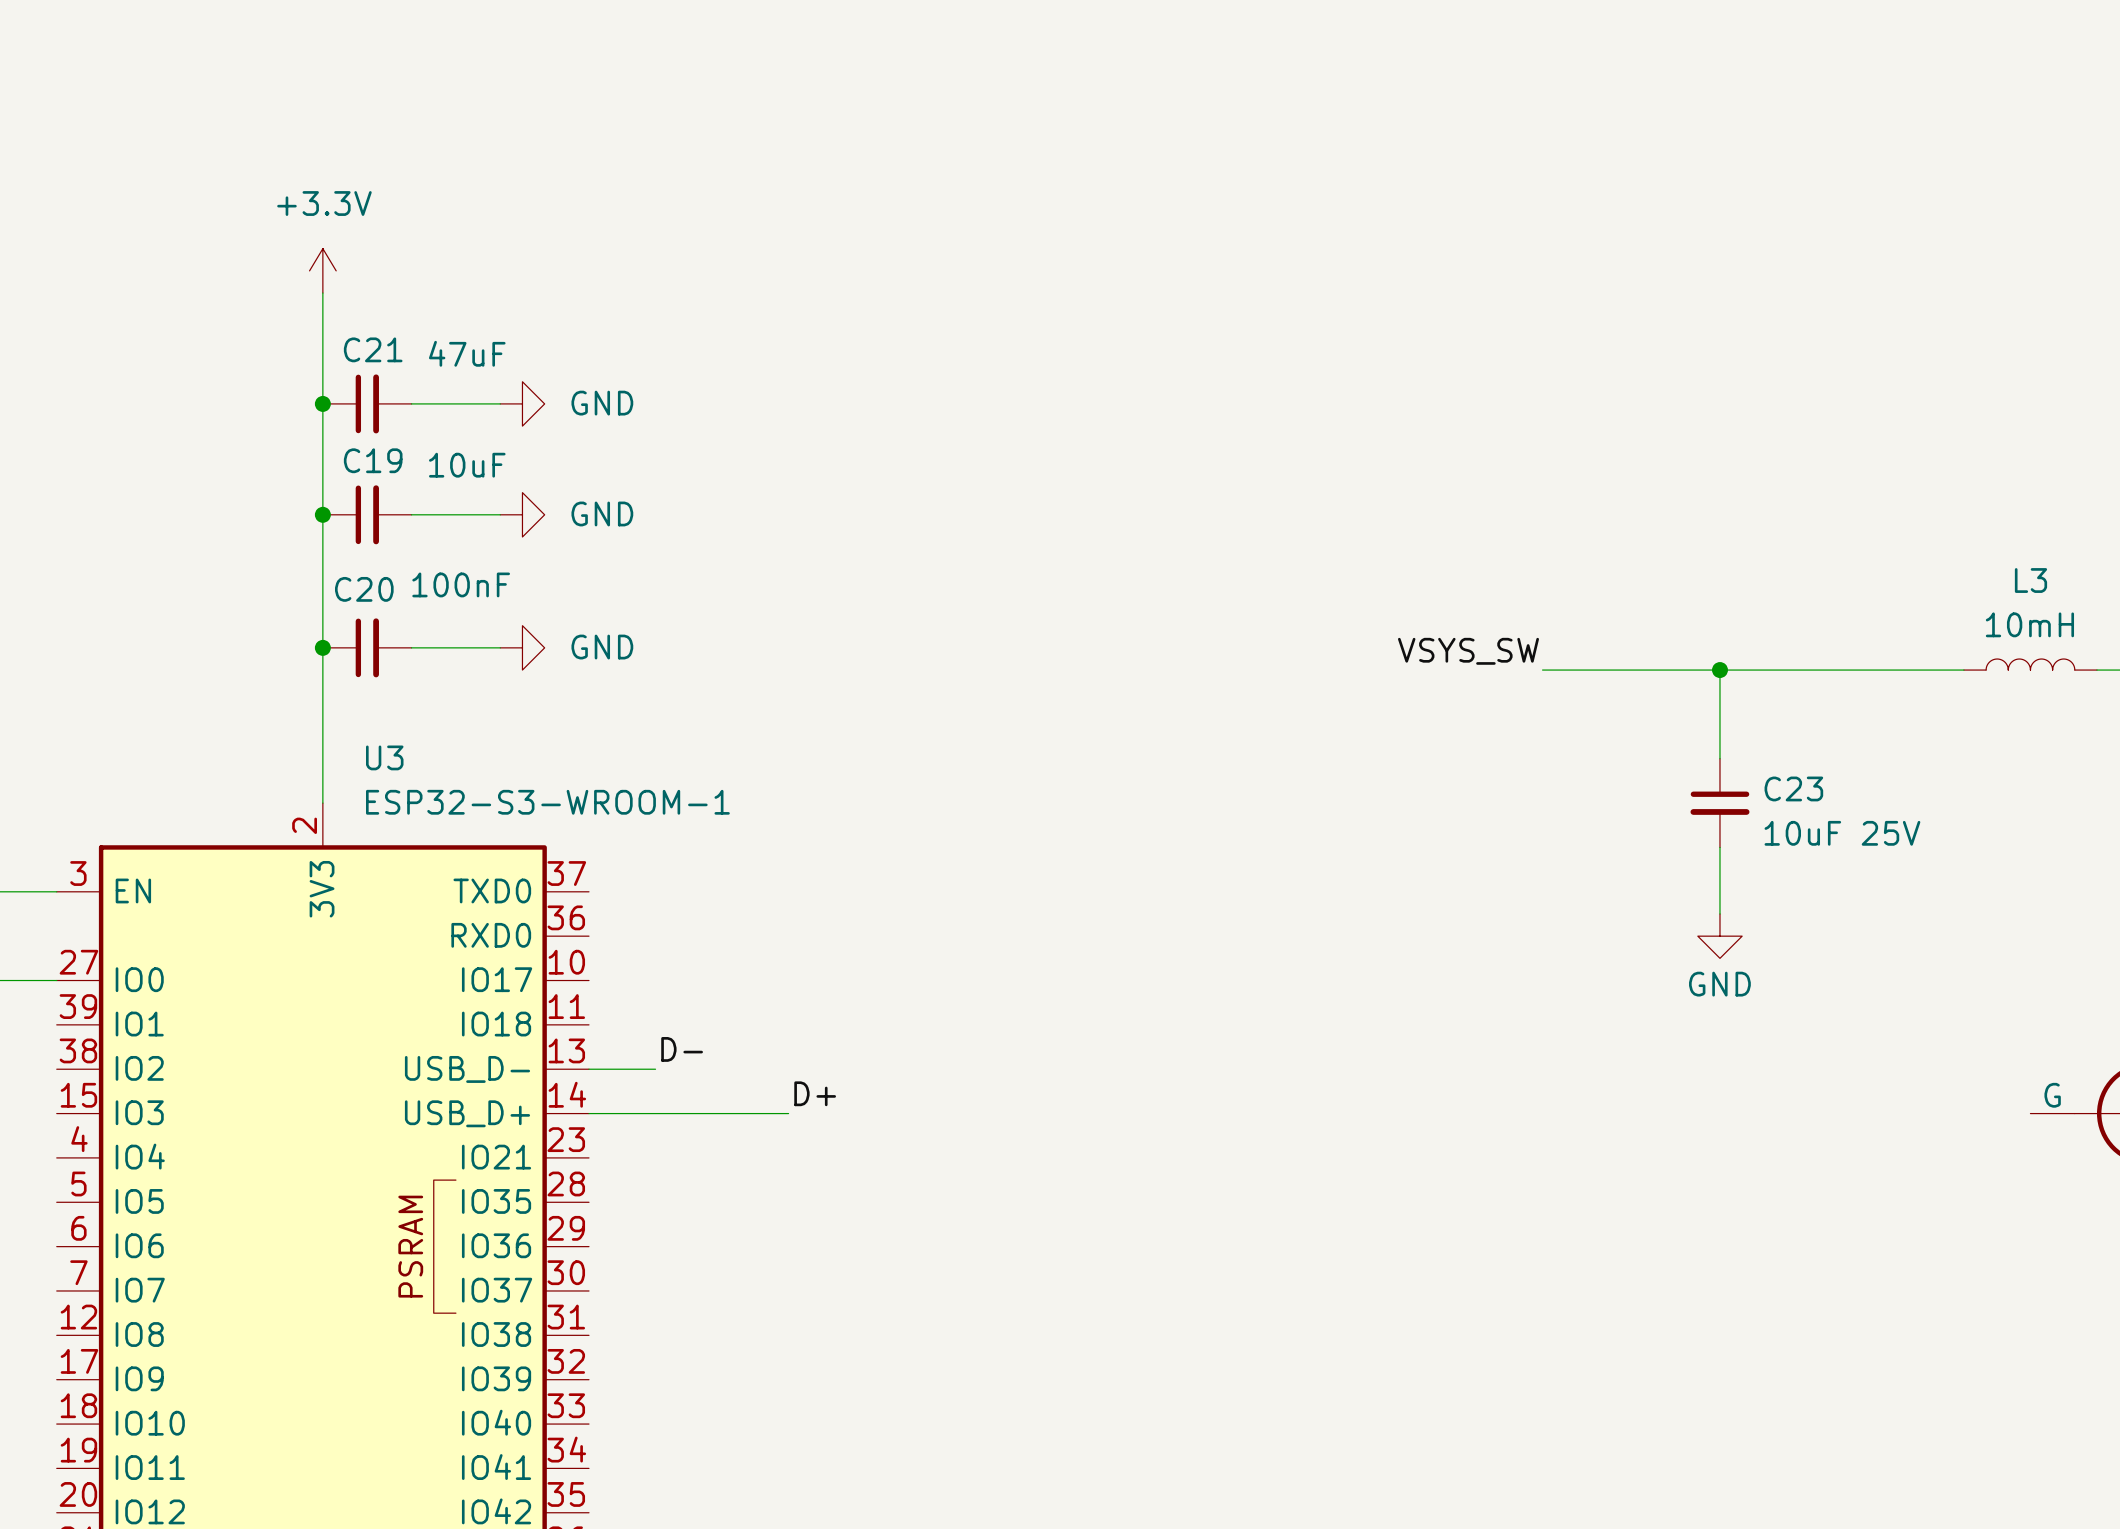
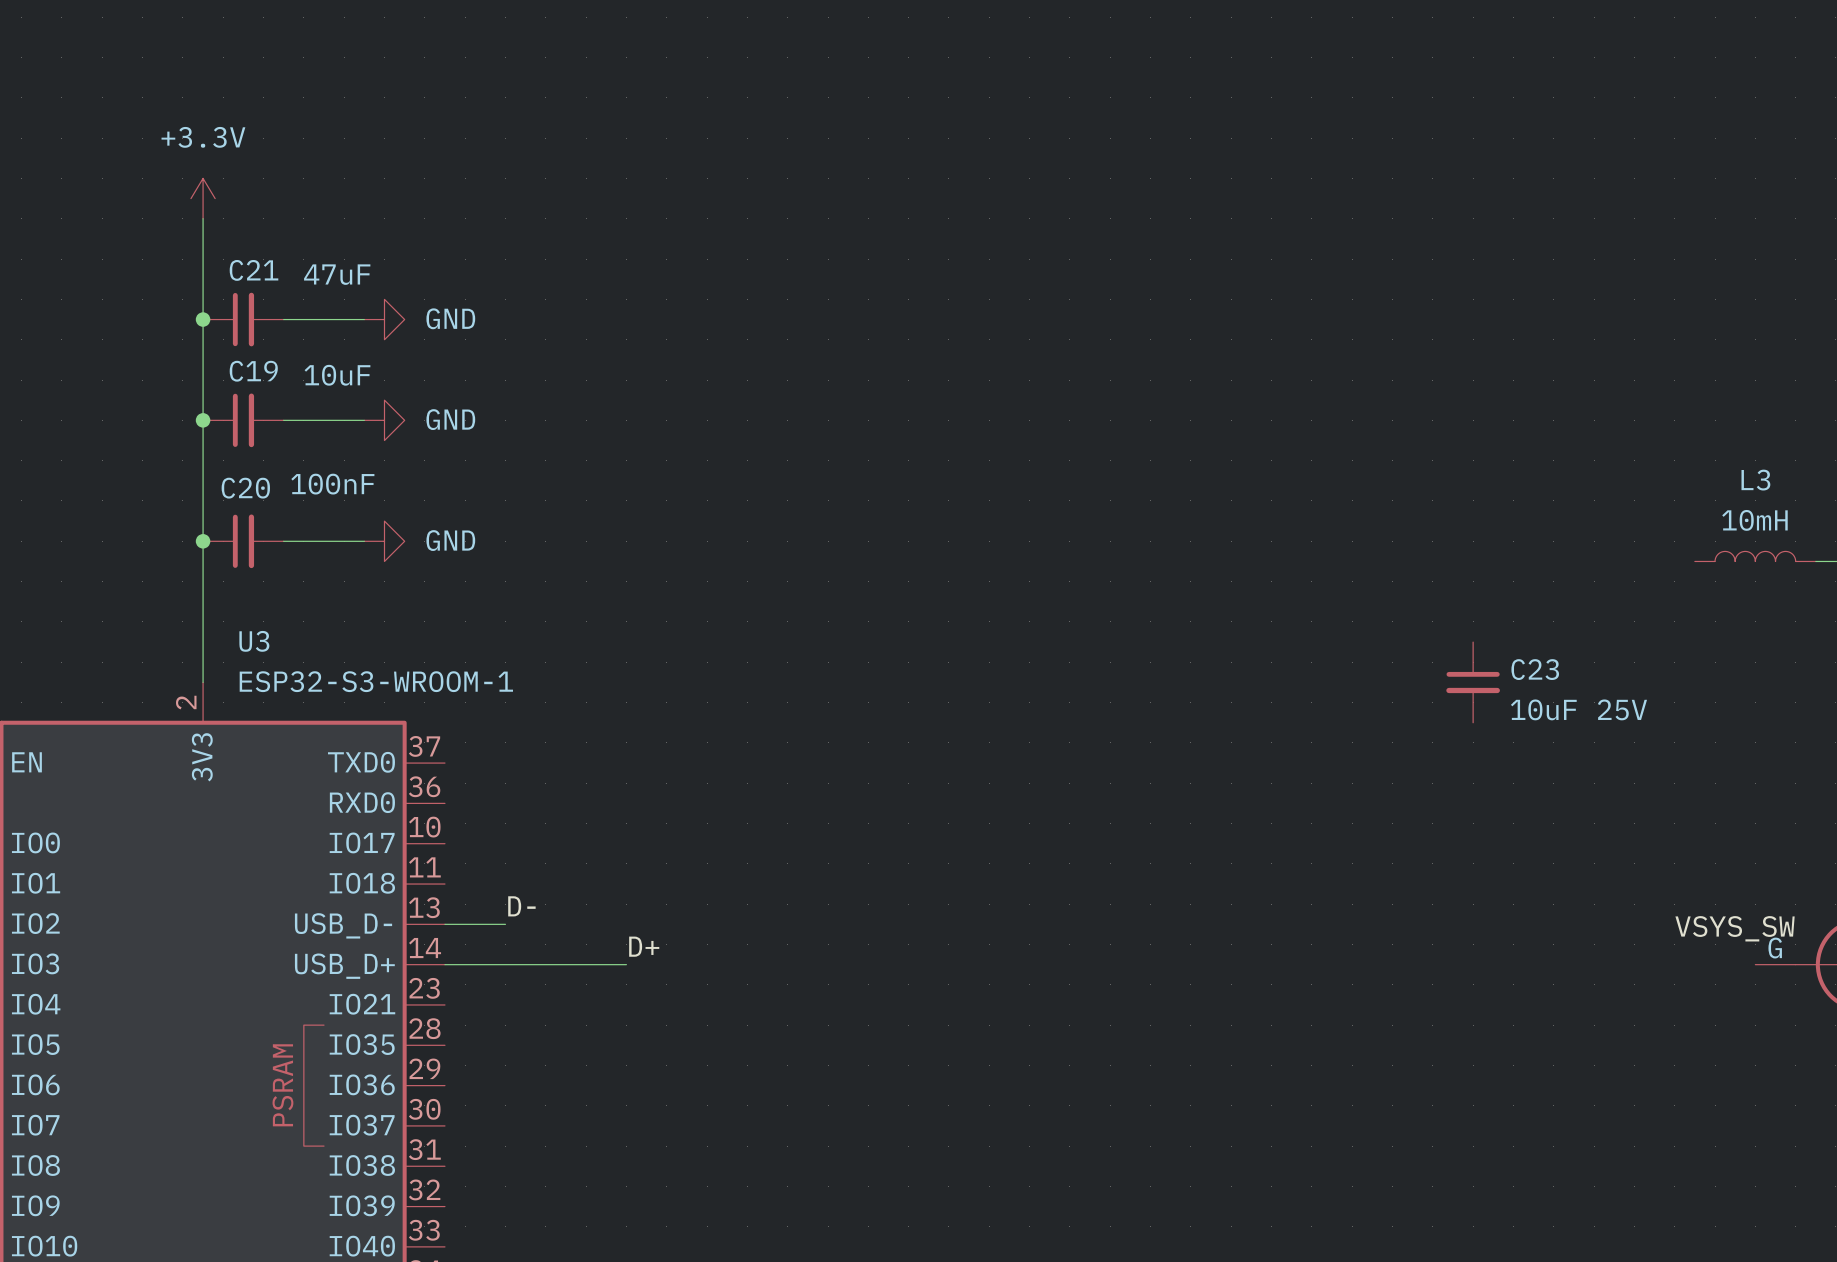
label: VSYS_SW (1468, 651) -> none
wire: (1542, 670) (1963, 670) -> none
wire: (1719, 670) (1719, 758) -> none
junction: (1719, 670) -> none
wire: (1719, 847) (1719, 913) -> none
power symbol: GND (1719, 936) -> none
label: none -> VSYS_SW (1735, 928)

